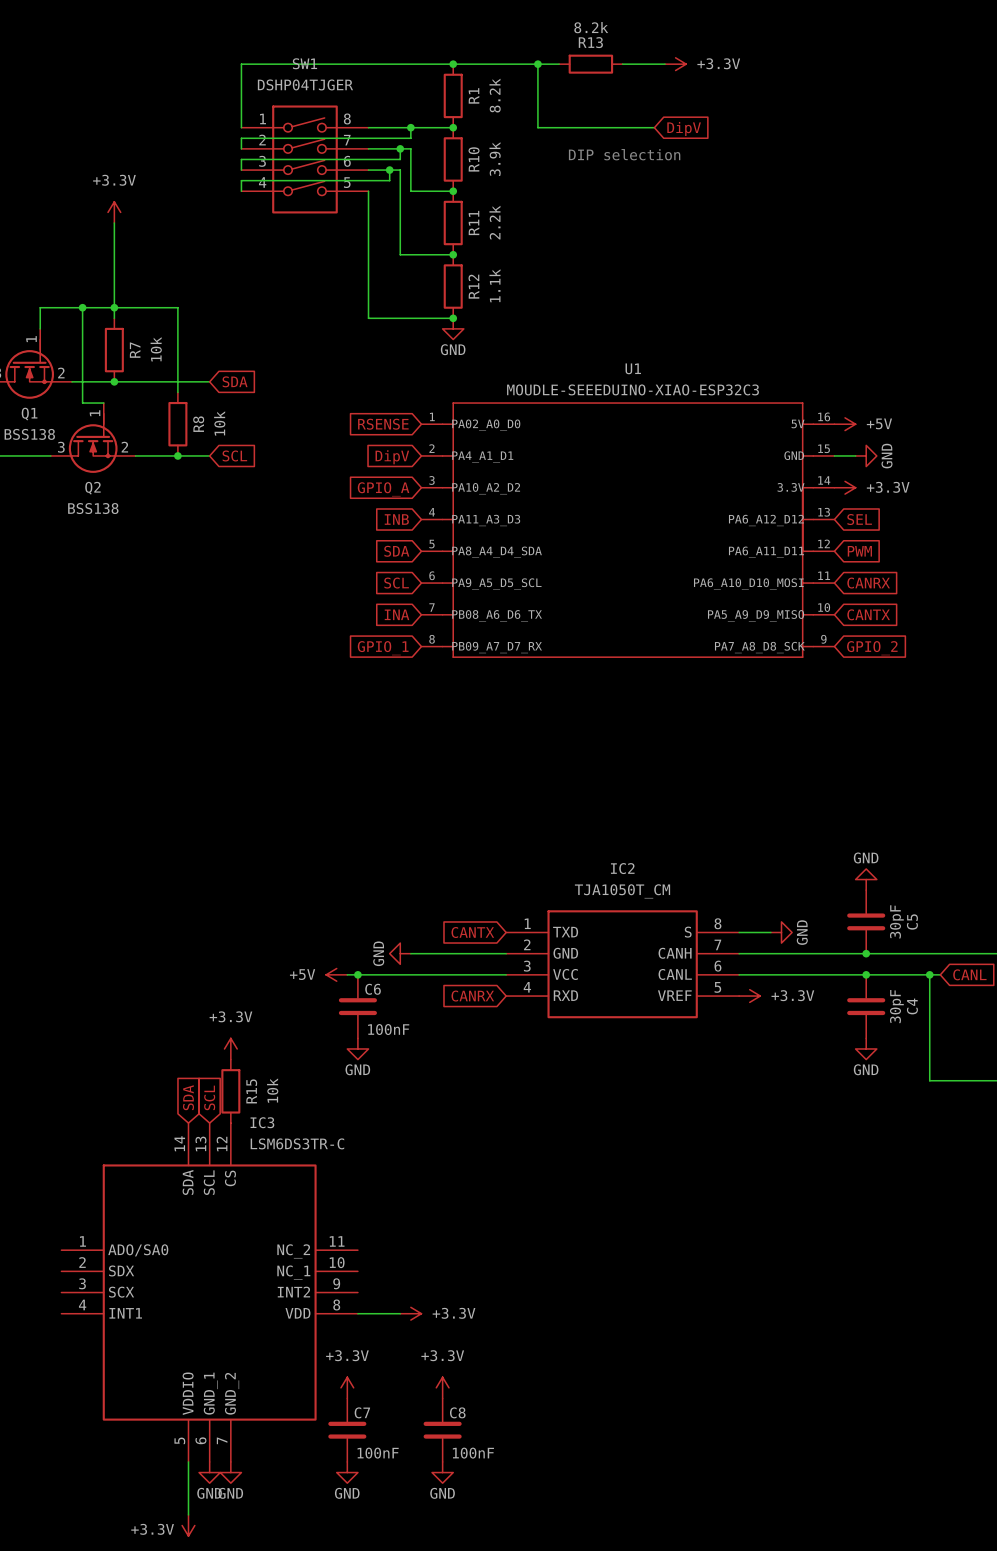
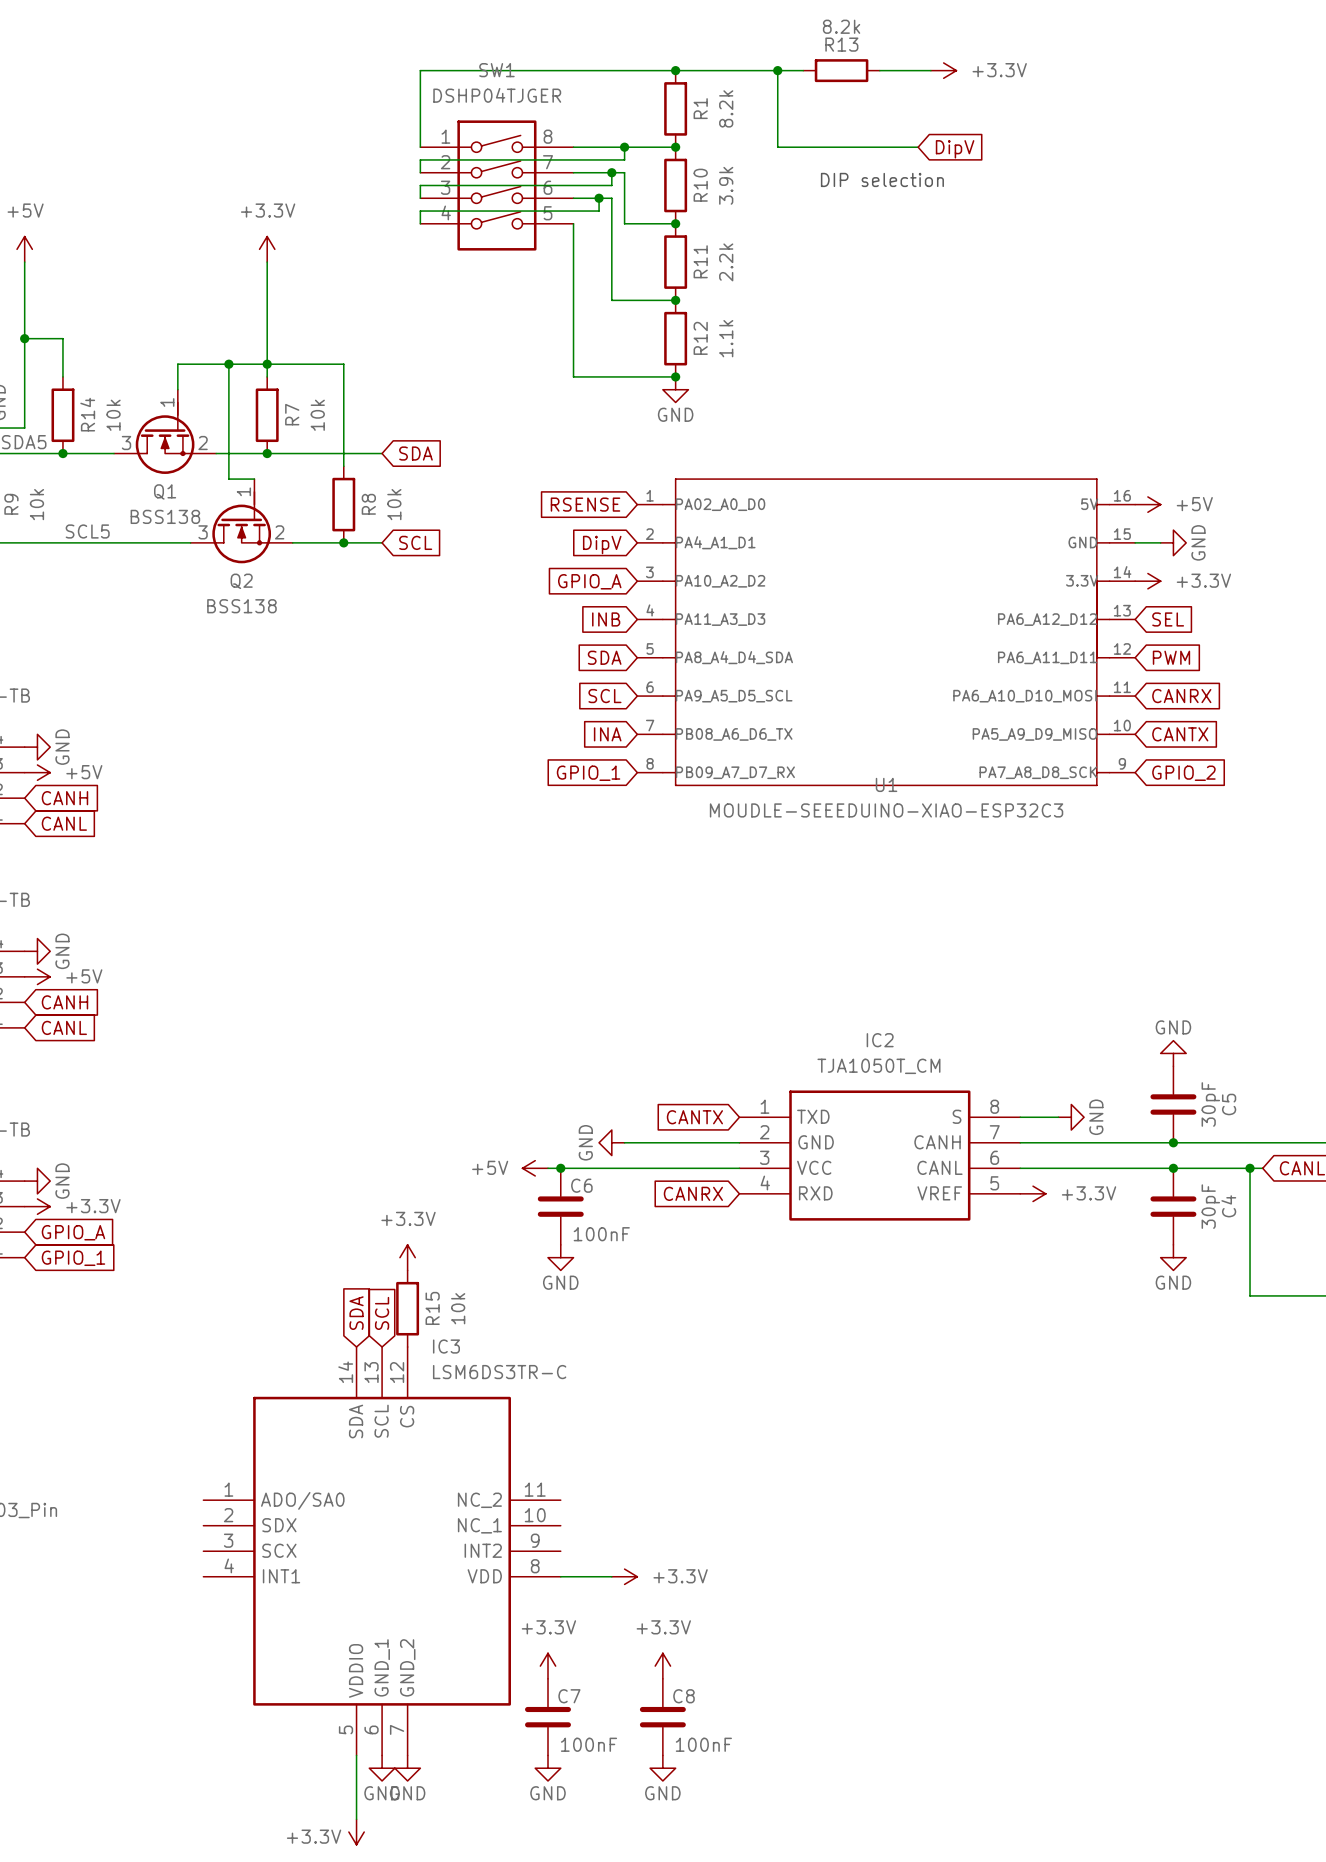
U1 name position: U1 (633, 368) -> U1 (886, 784)
U1 value position: MOUDLE-SEEEDUINO-XIAO-ESP32C3 (633, 389) -> MOUDLE-SEEEDUINO-XIAO-ESP32C3 (886, 810)

